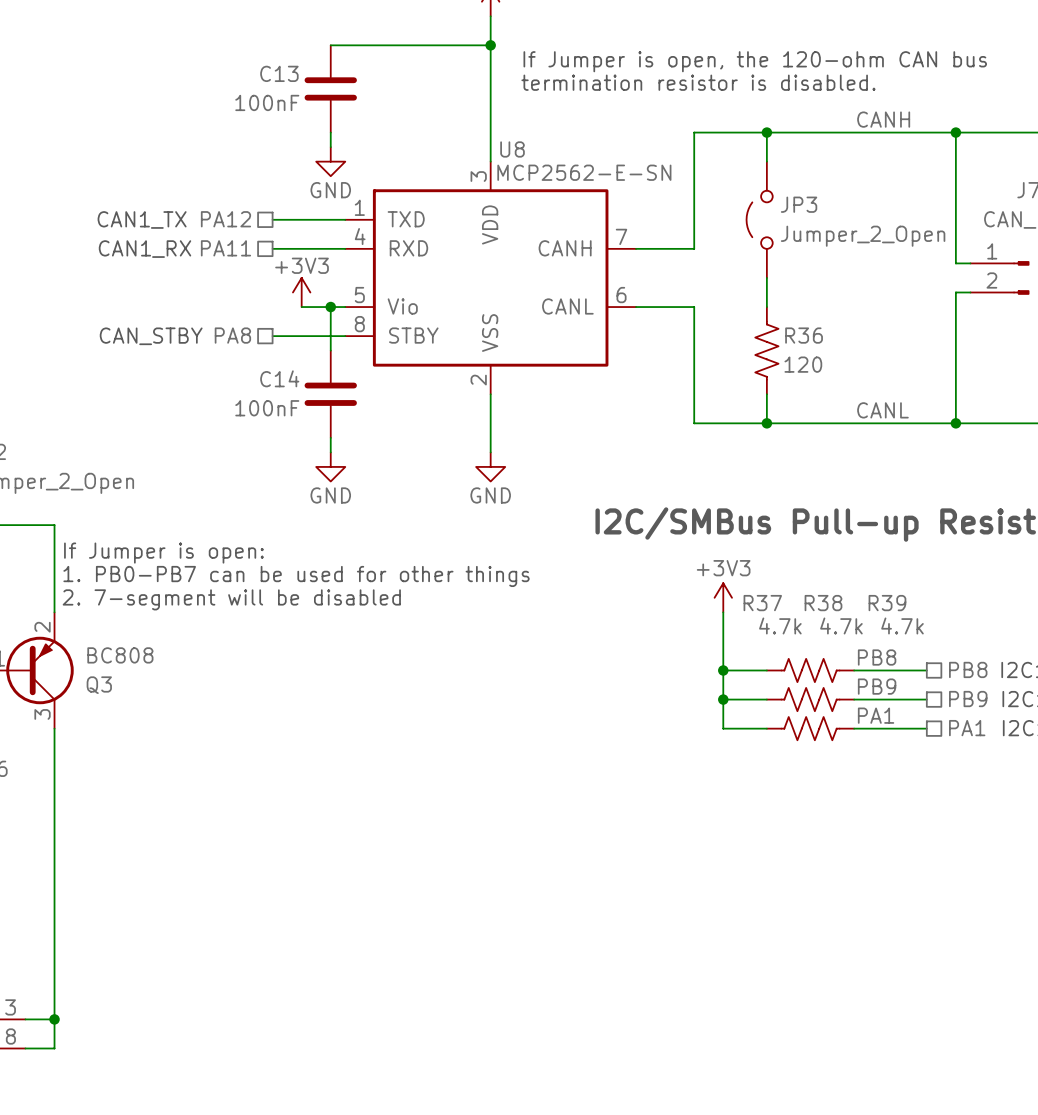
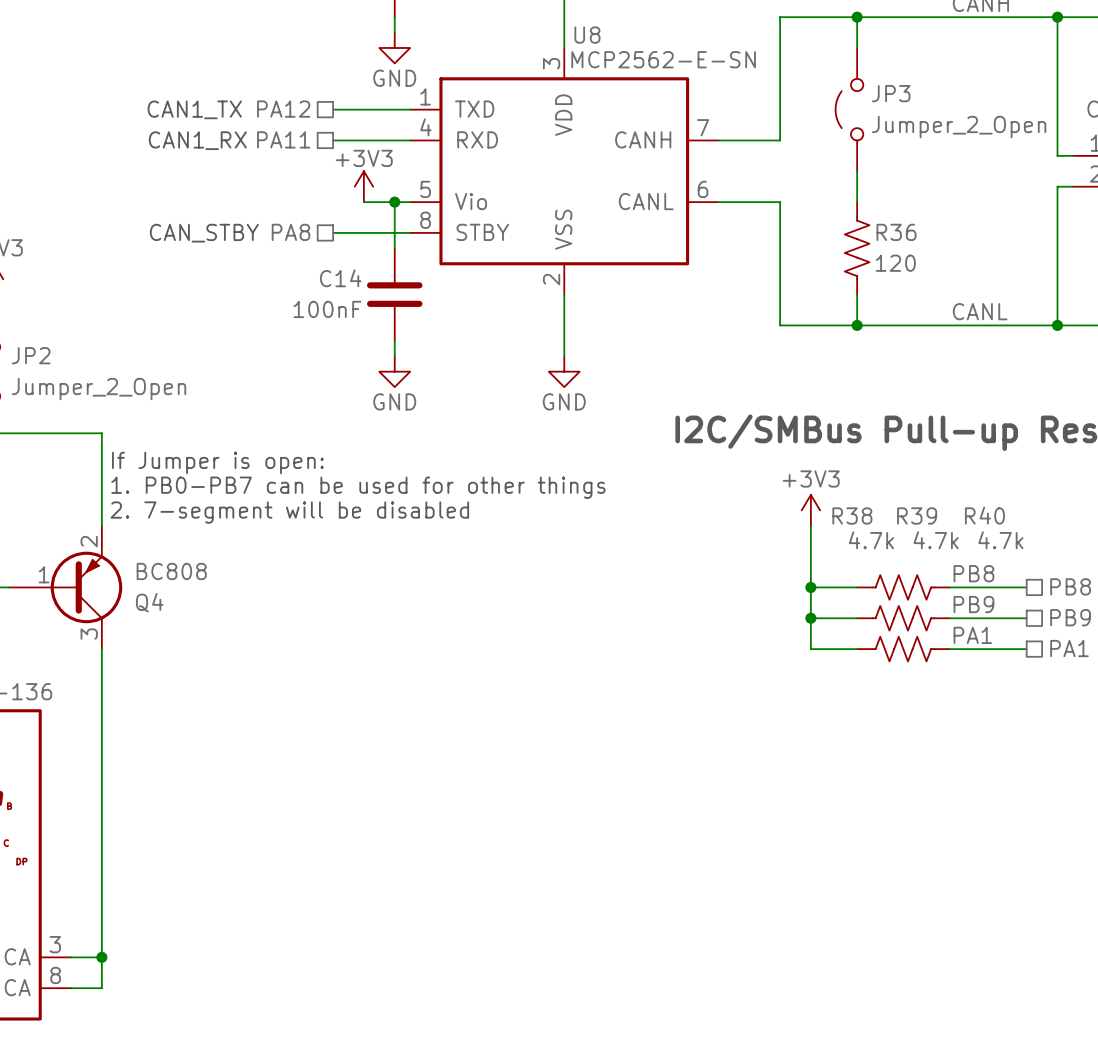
R37 name: R37 (762, 603) -> R38 (852, 515)
R38 name: R38 (823, 603) -> R39 (917, 515)
R39 name: R39 (887, 603) -> R40 (984, 515)
Q3 name: Q3 (99, 685) -> Q4 (149, 602)

